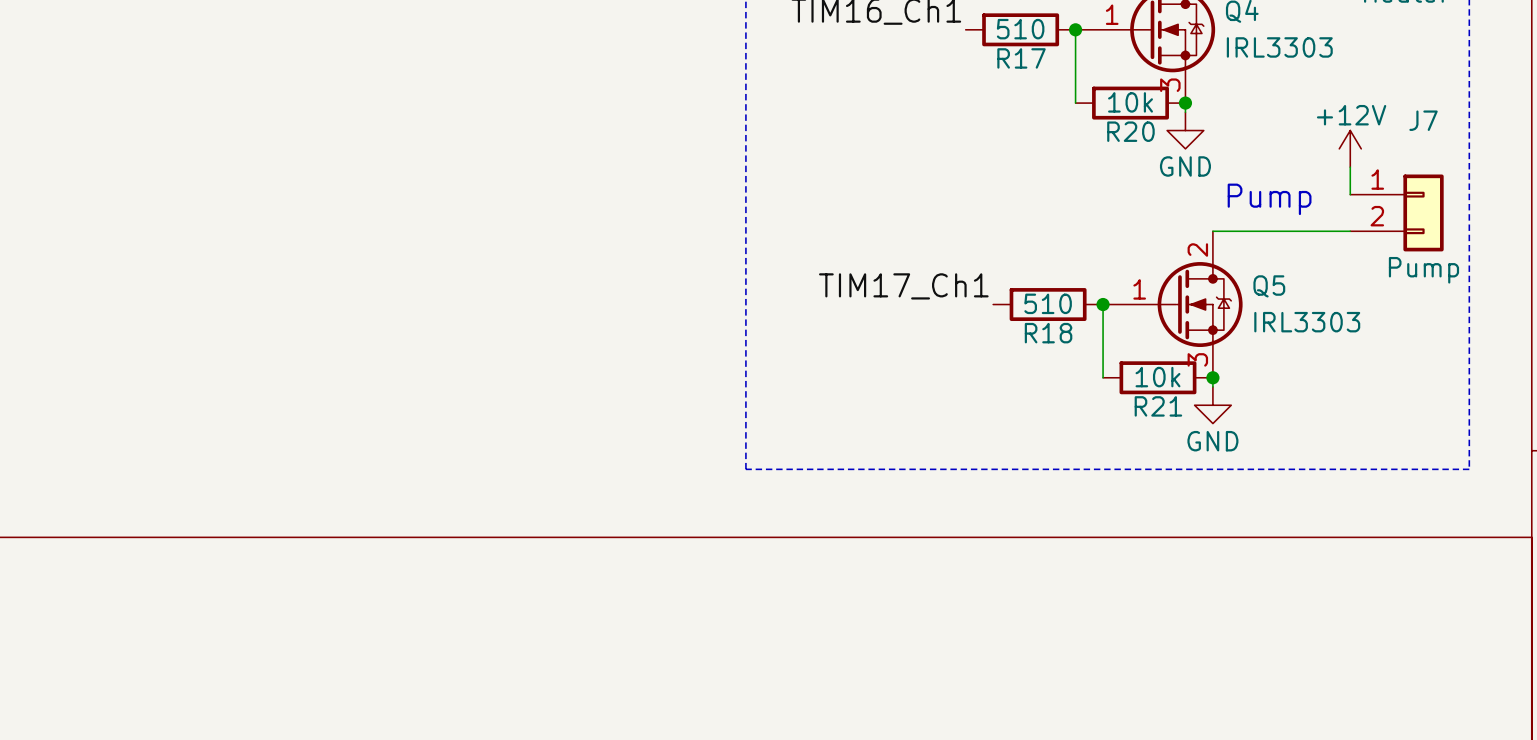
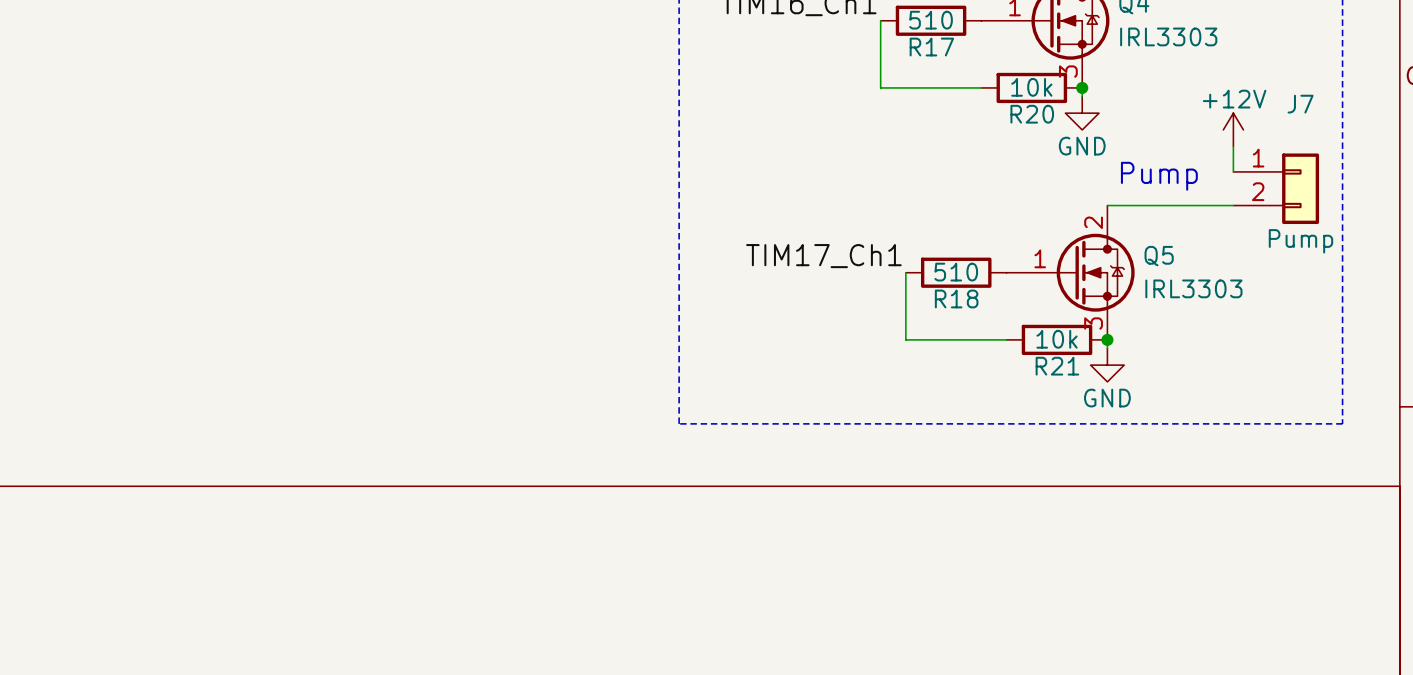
wire: (1075, 29) (1075, 103) -> (880, 20) (880, 87) (981, 87)
junction: (1075, 29) -> none
wire: (1103, 304) (1103, 377) -> (905, 272) (905, 339) (1006, 339)
junction: (1103, 304) -> none

